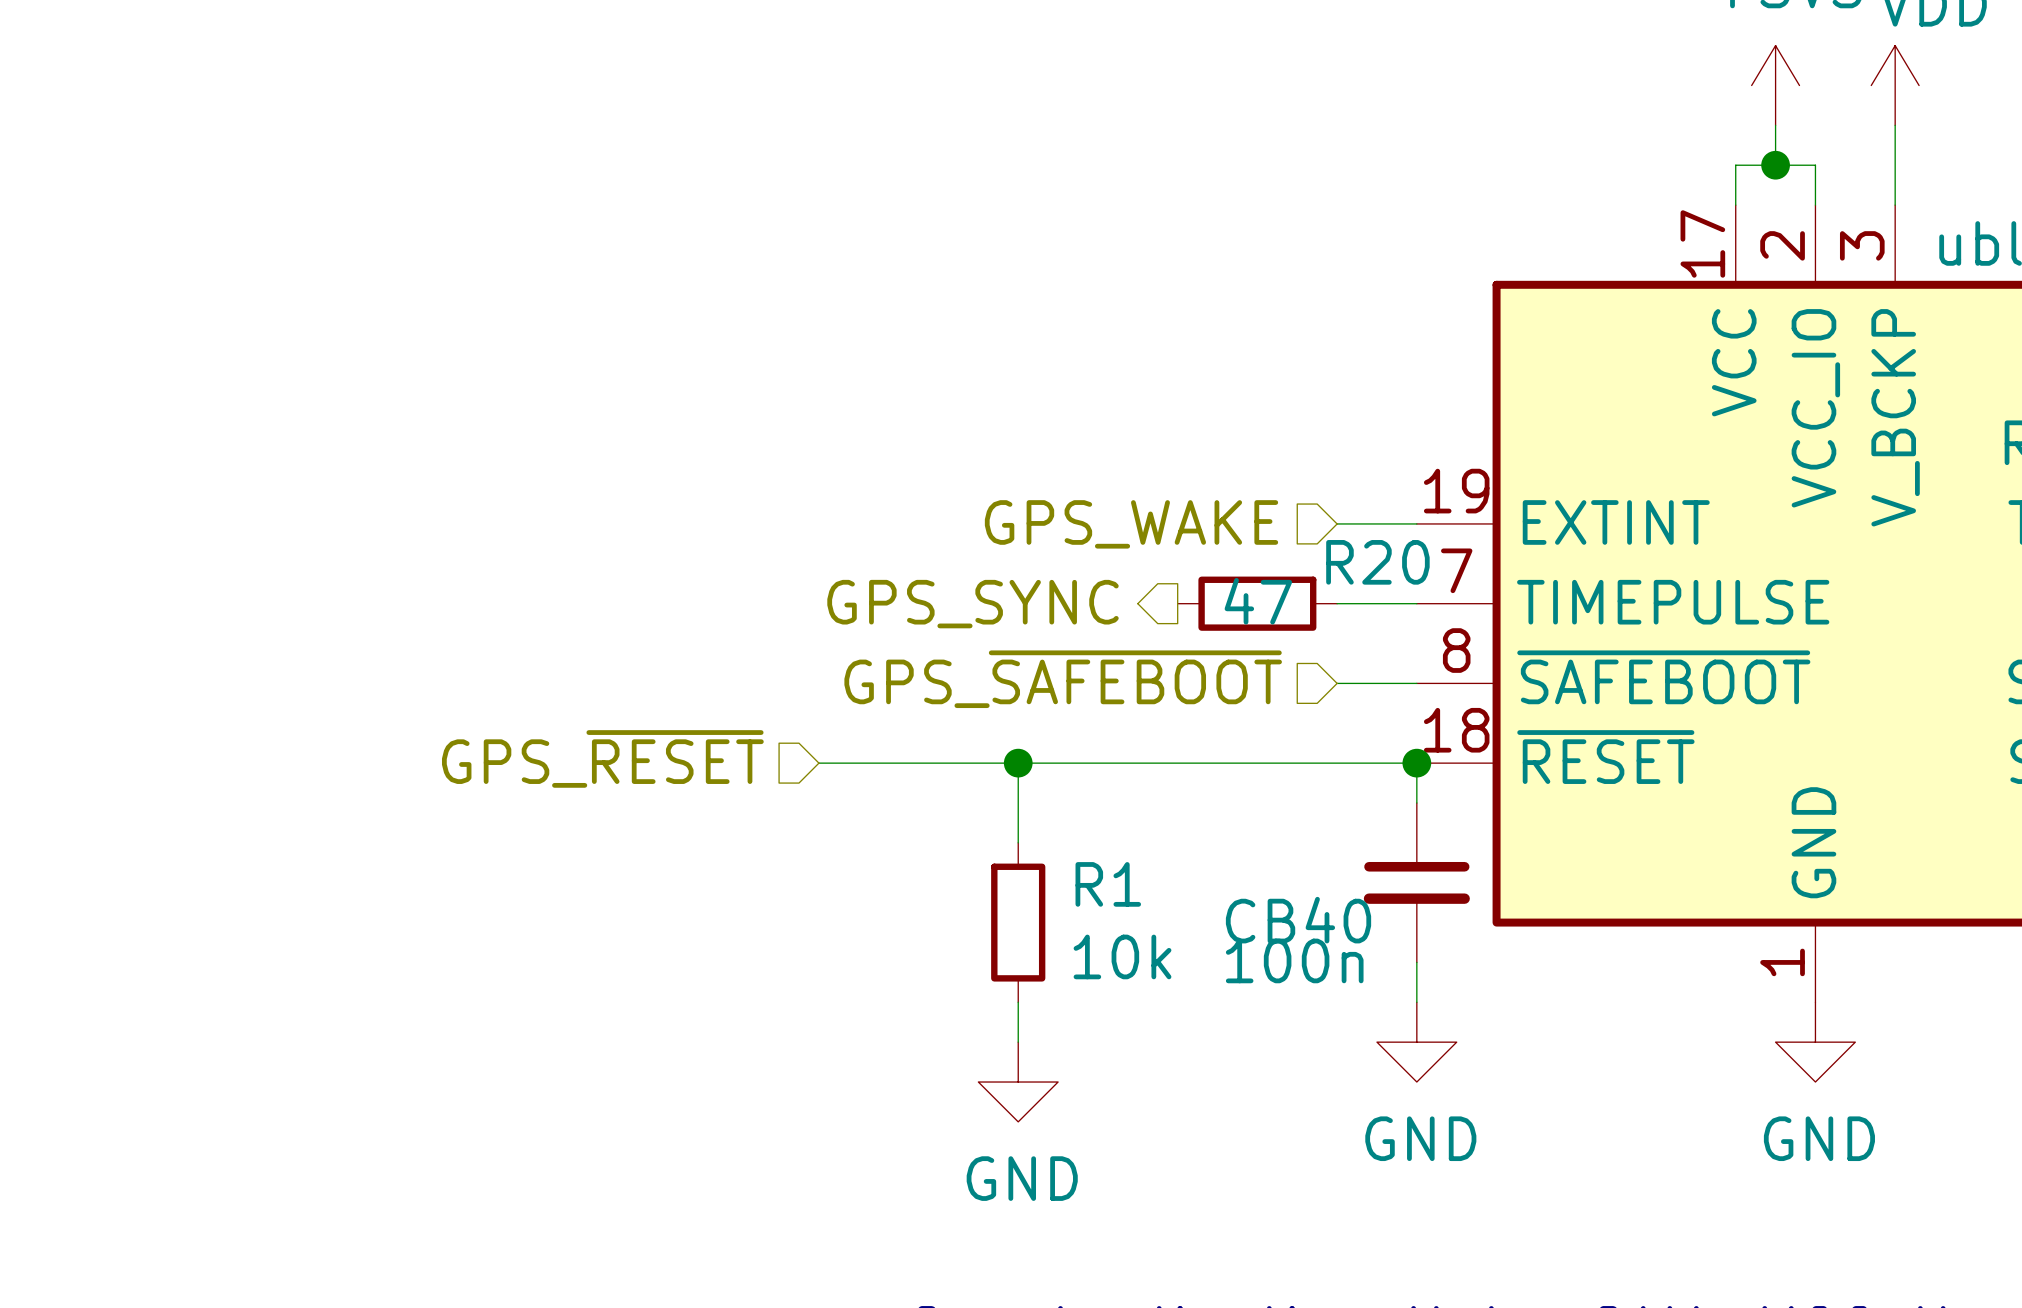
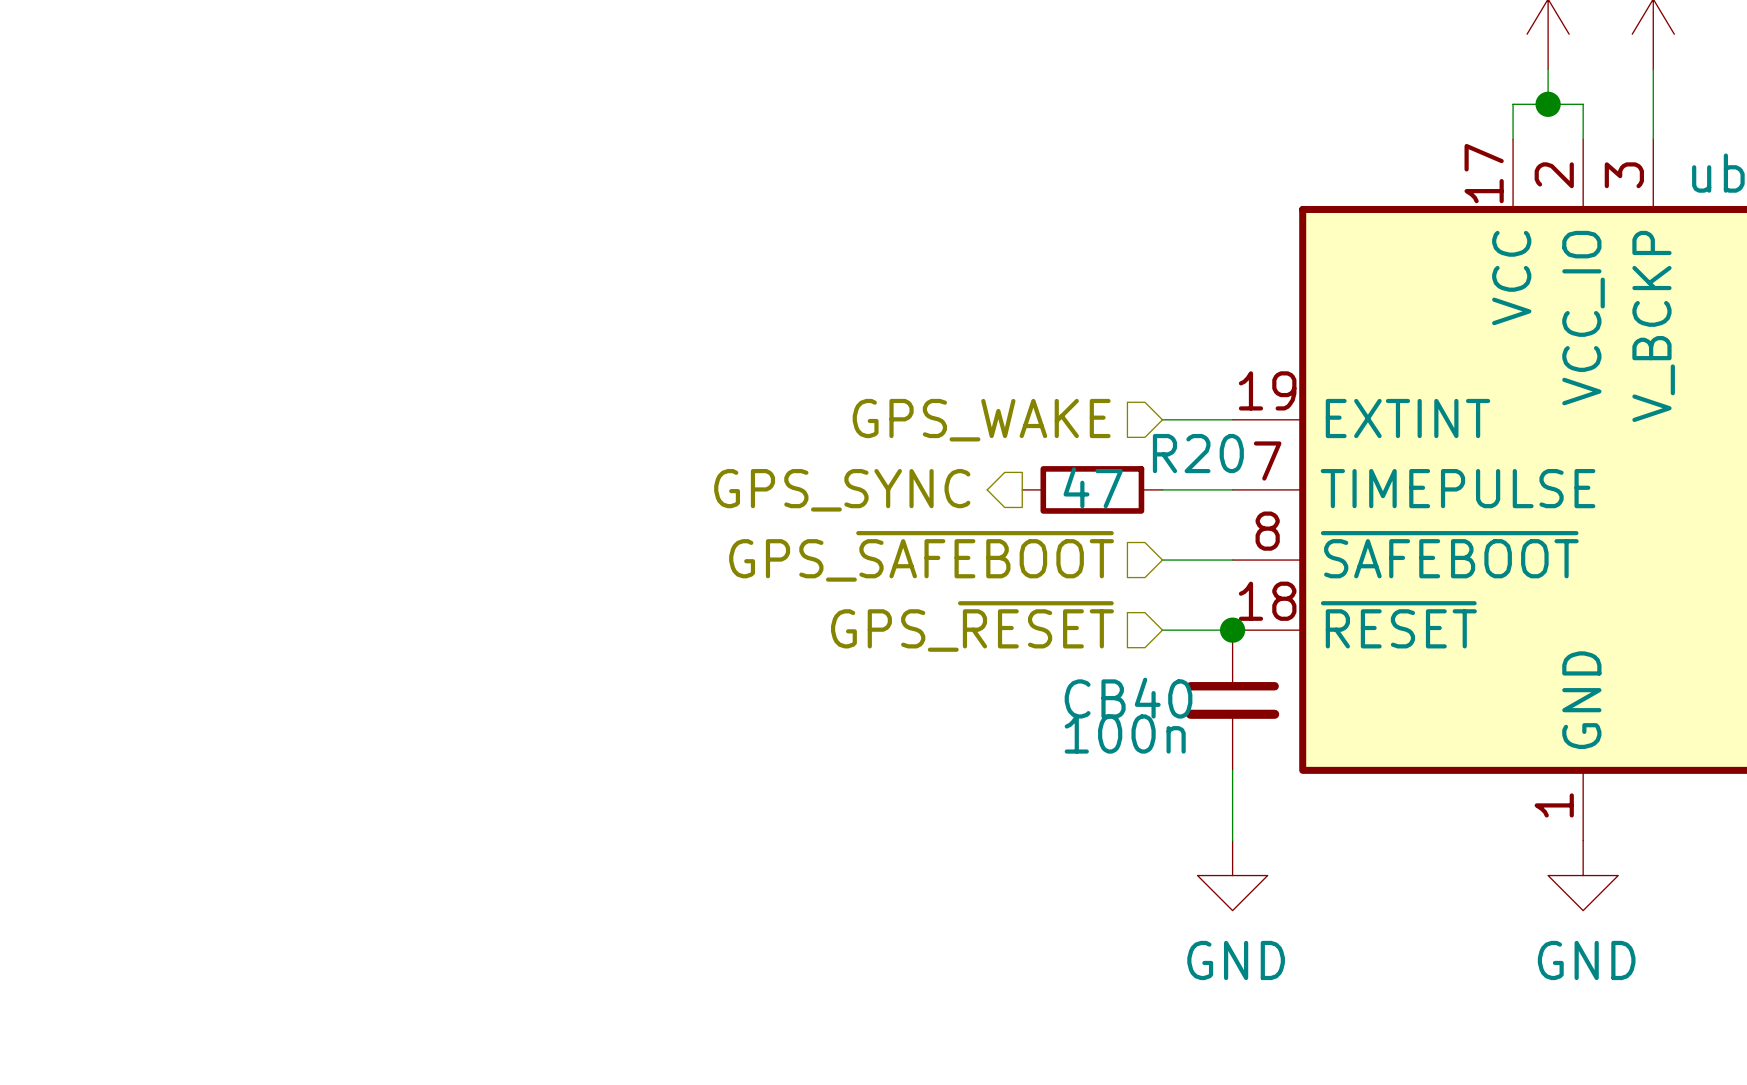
hierarchical label position: GPS_~{RESET} (602, 758) -> GPS_~{RESET} (972, 626)
wire: (818, 763) (1337, 763) -> none
wire: (1018, 763) (1018, 842) -> none
junction: (1018, 763) -> none
CB40 position: (1416, 882) -> (1232, 700)
CB40 name position: CB40 (1298, 920) -> CB40 (1128, 698)
R1: 10k (1018, 922) -> none
CB40 value position: 100n (1294, 960) -> 100n (1125, 734)
wire: (1018, 1002) (1018, 1042) -> none
power symbol: GND (1018, 1082) -> none

